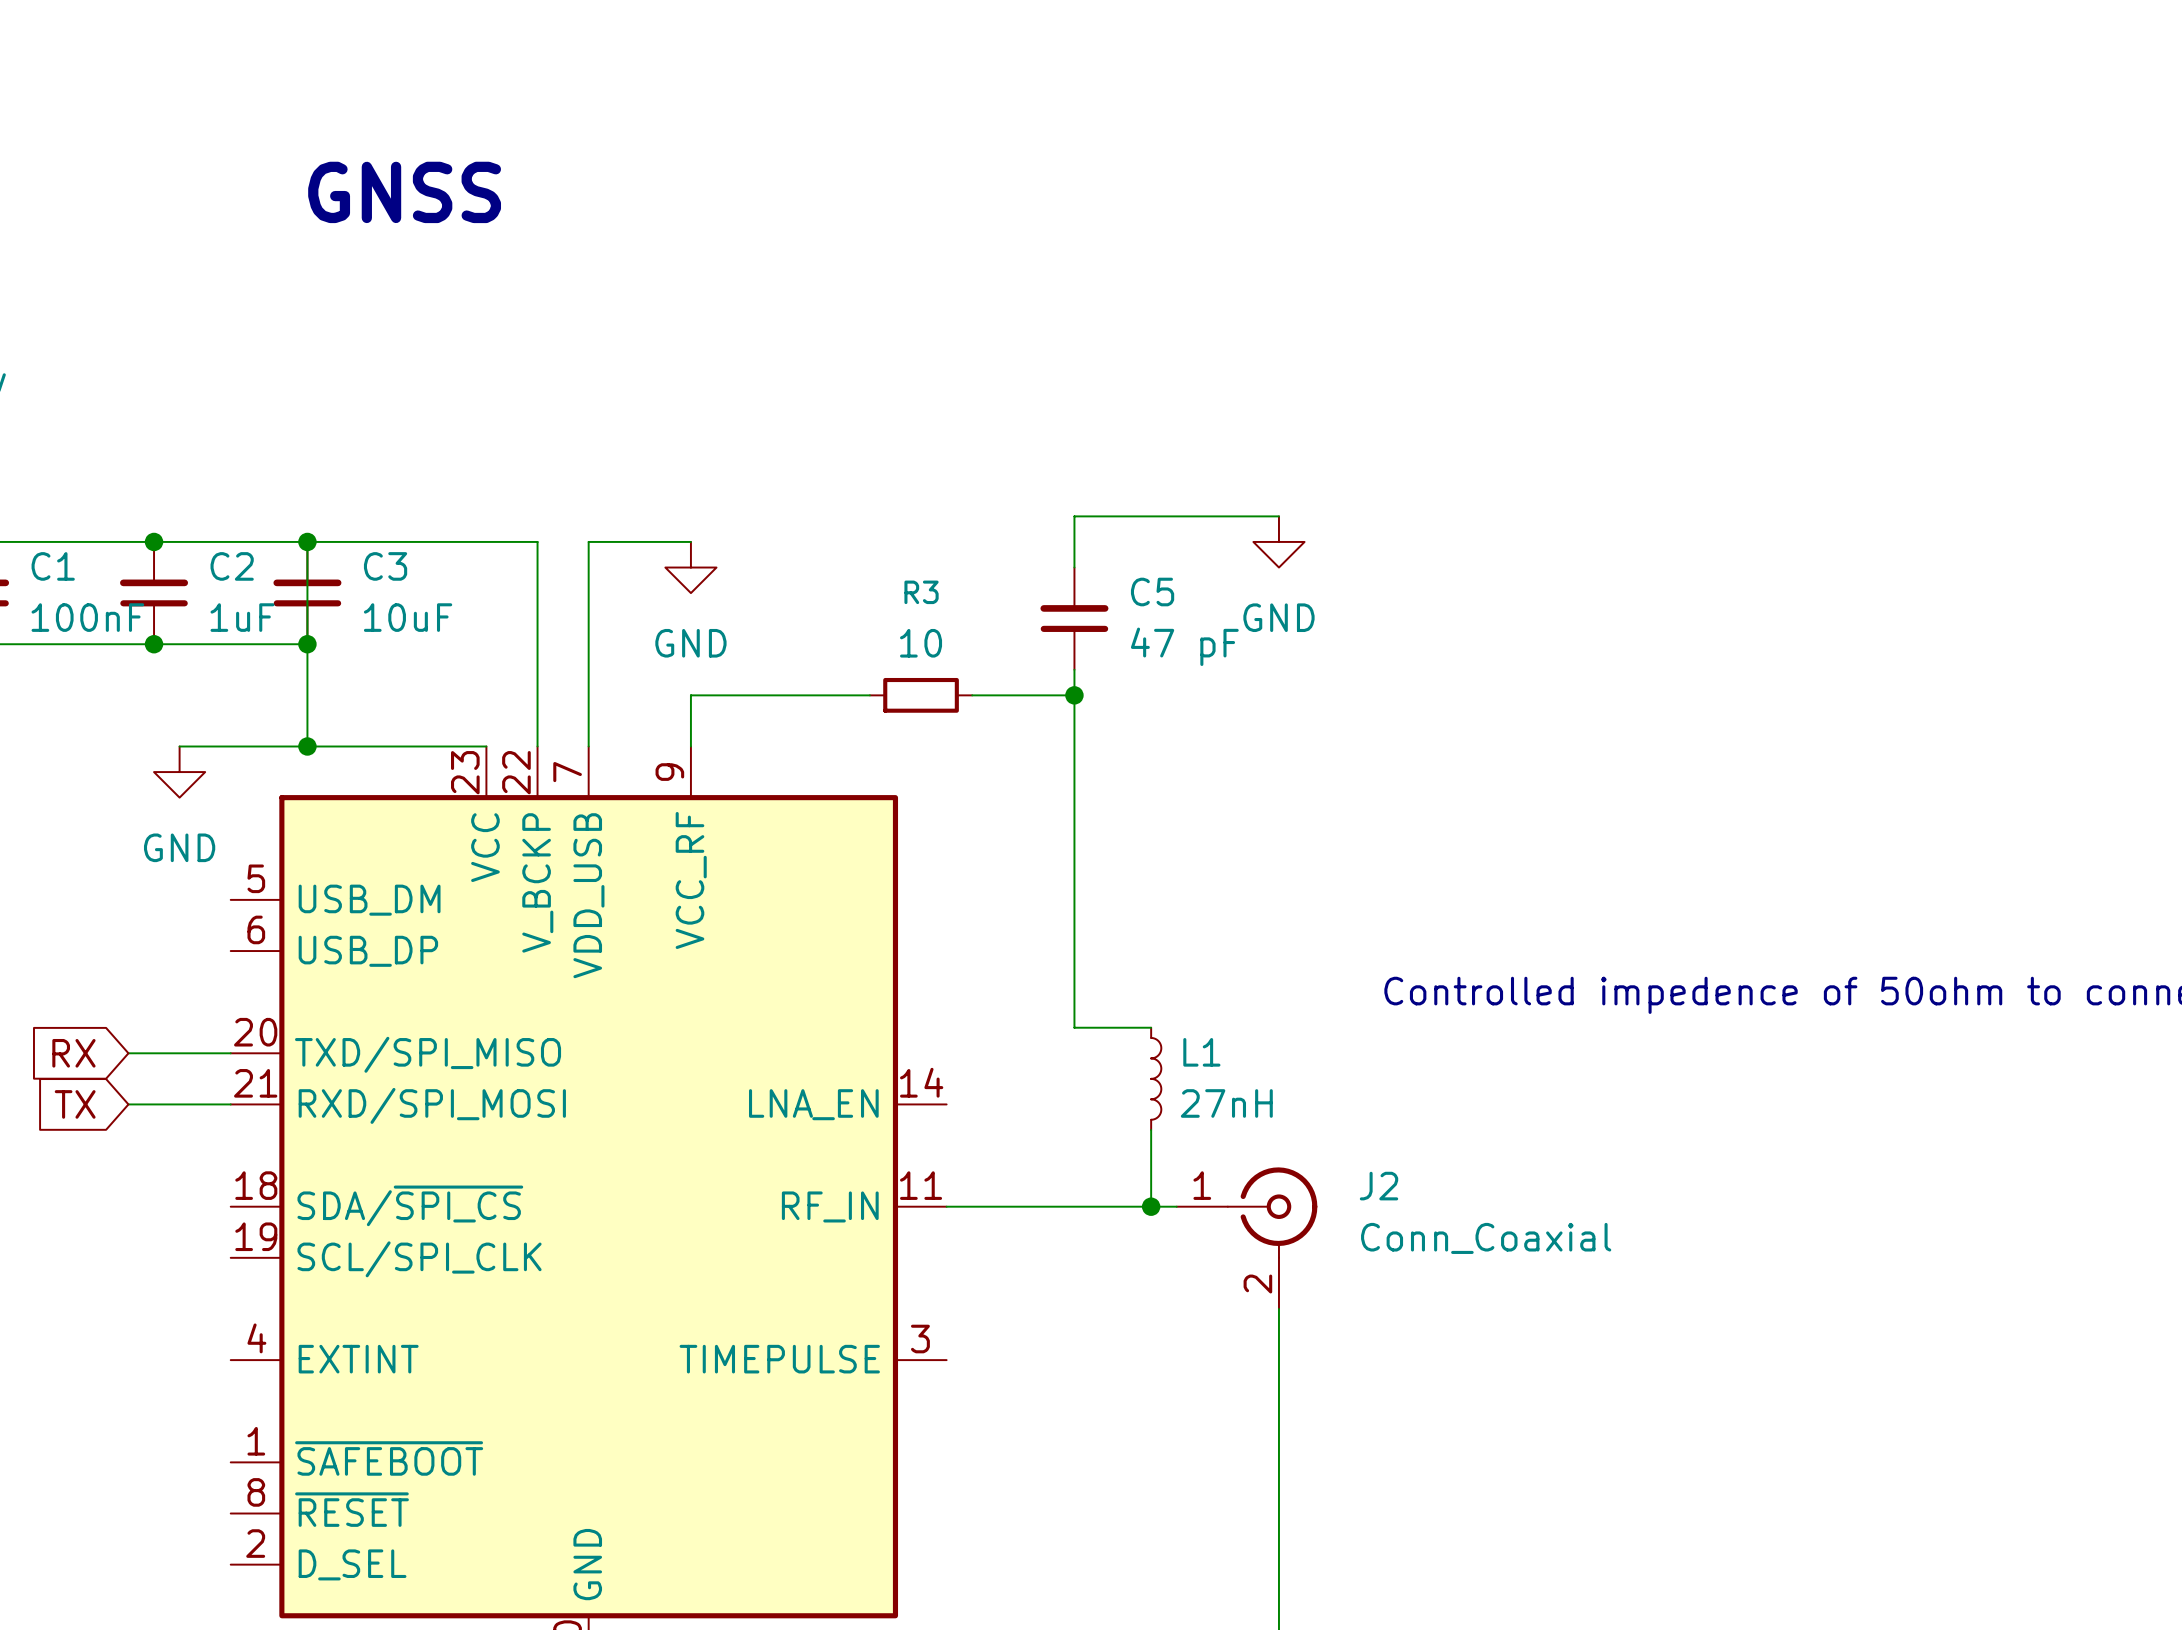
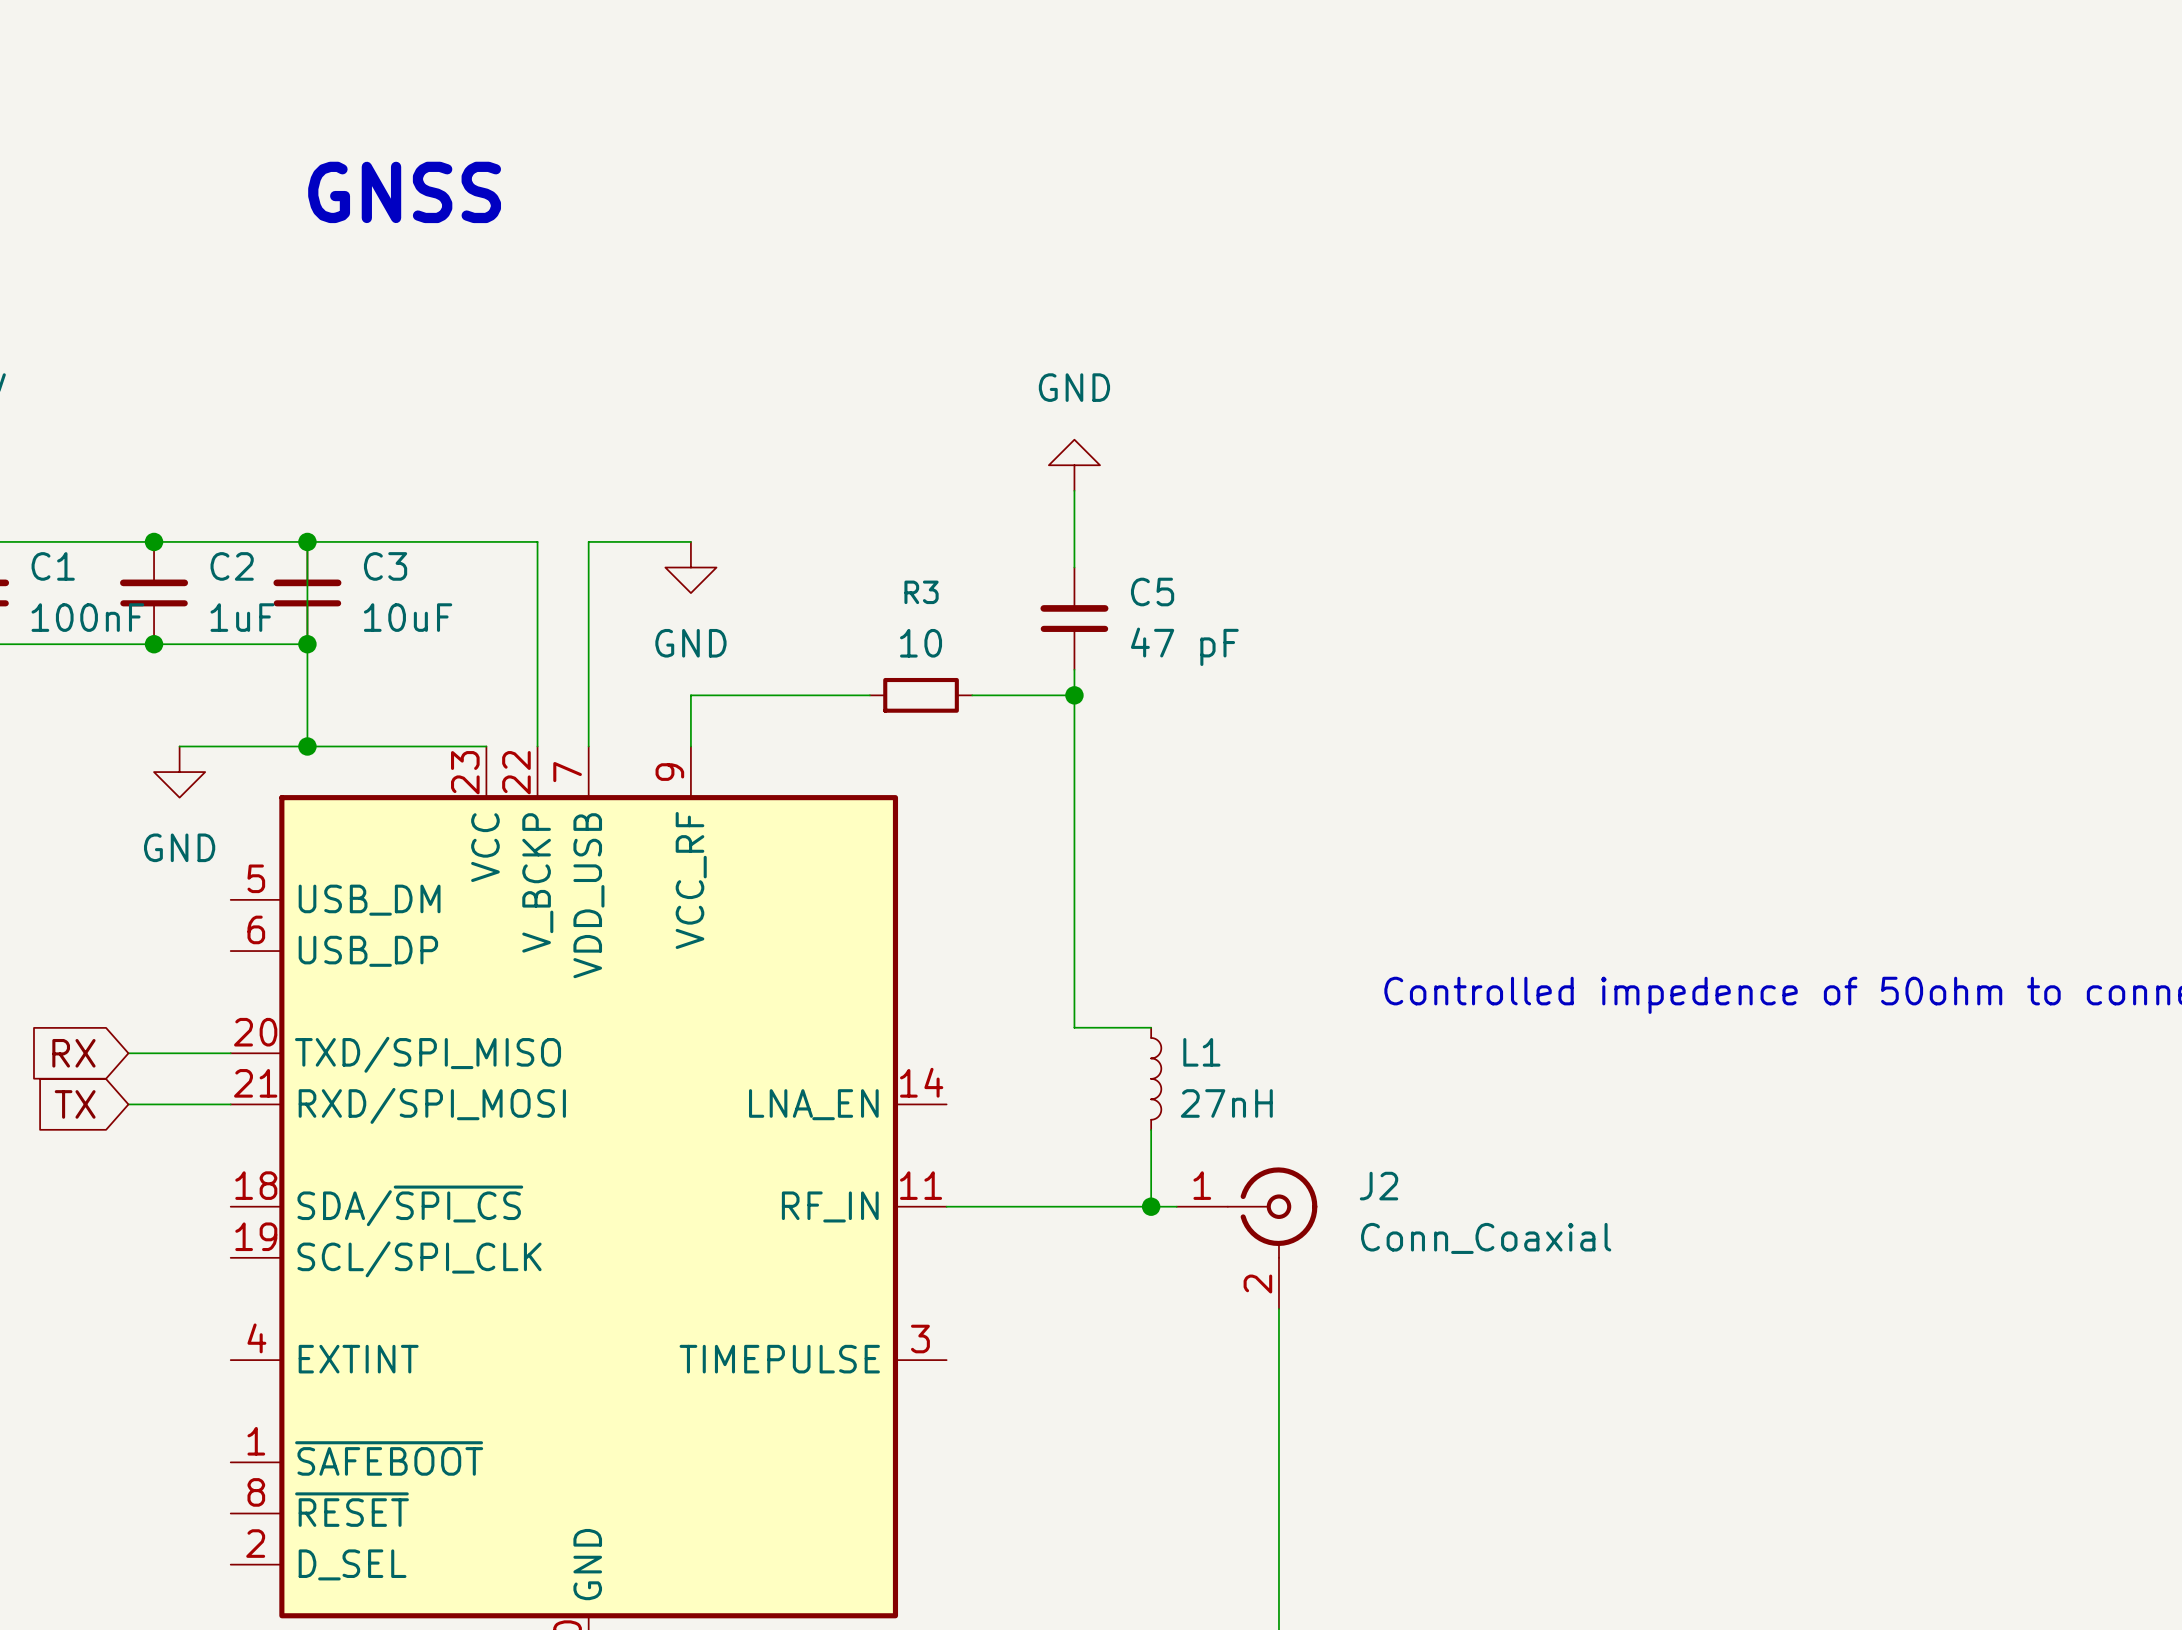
wire: (1074, 516) (1278, 516) -> (1074, 516) (1074, 490)
power symbol rotation: 0° (1278, 541) -> 180° (1074, 465)
power symbol position: GND (1278, 541) -> GND (1074, 465)

